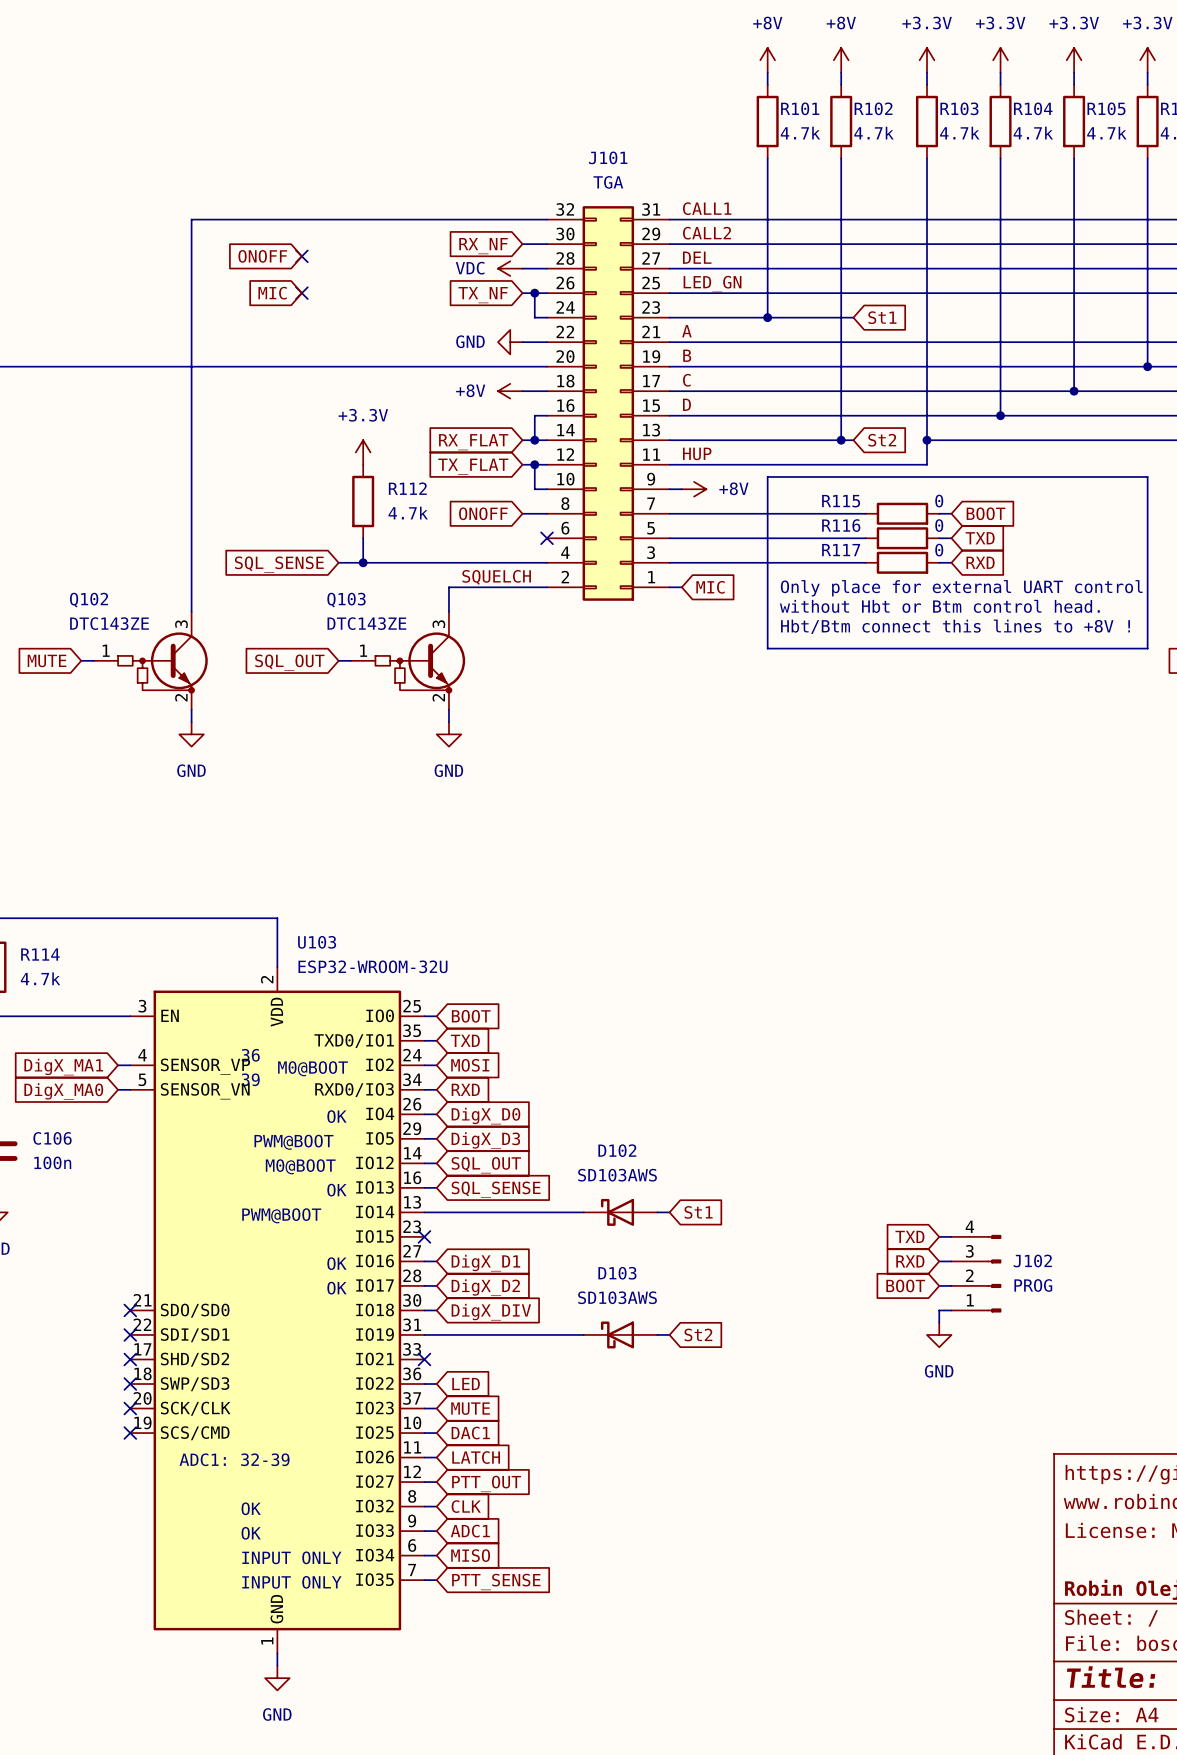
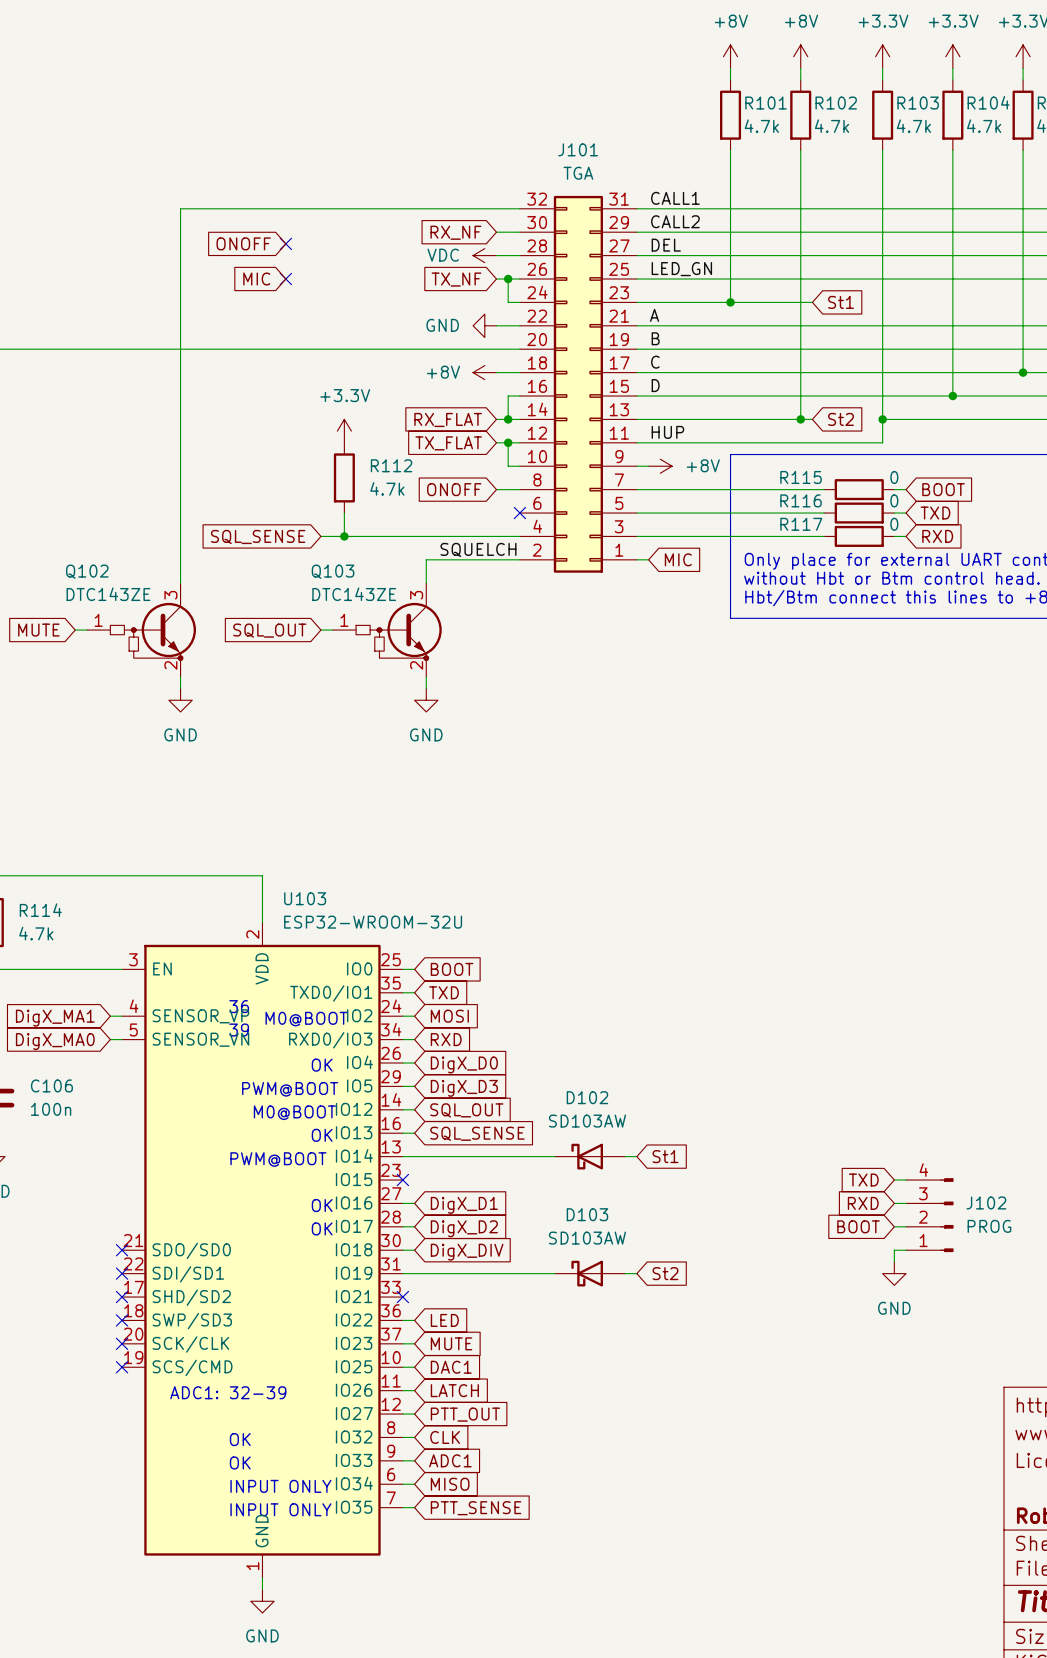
D102 value: SD103AWS (617, 1175) -> SD103AW (587, 1121)
D103 value: SD103AWS (617, 1297) -> SD103AW (587, 1238)

